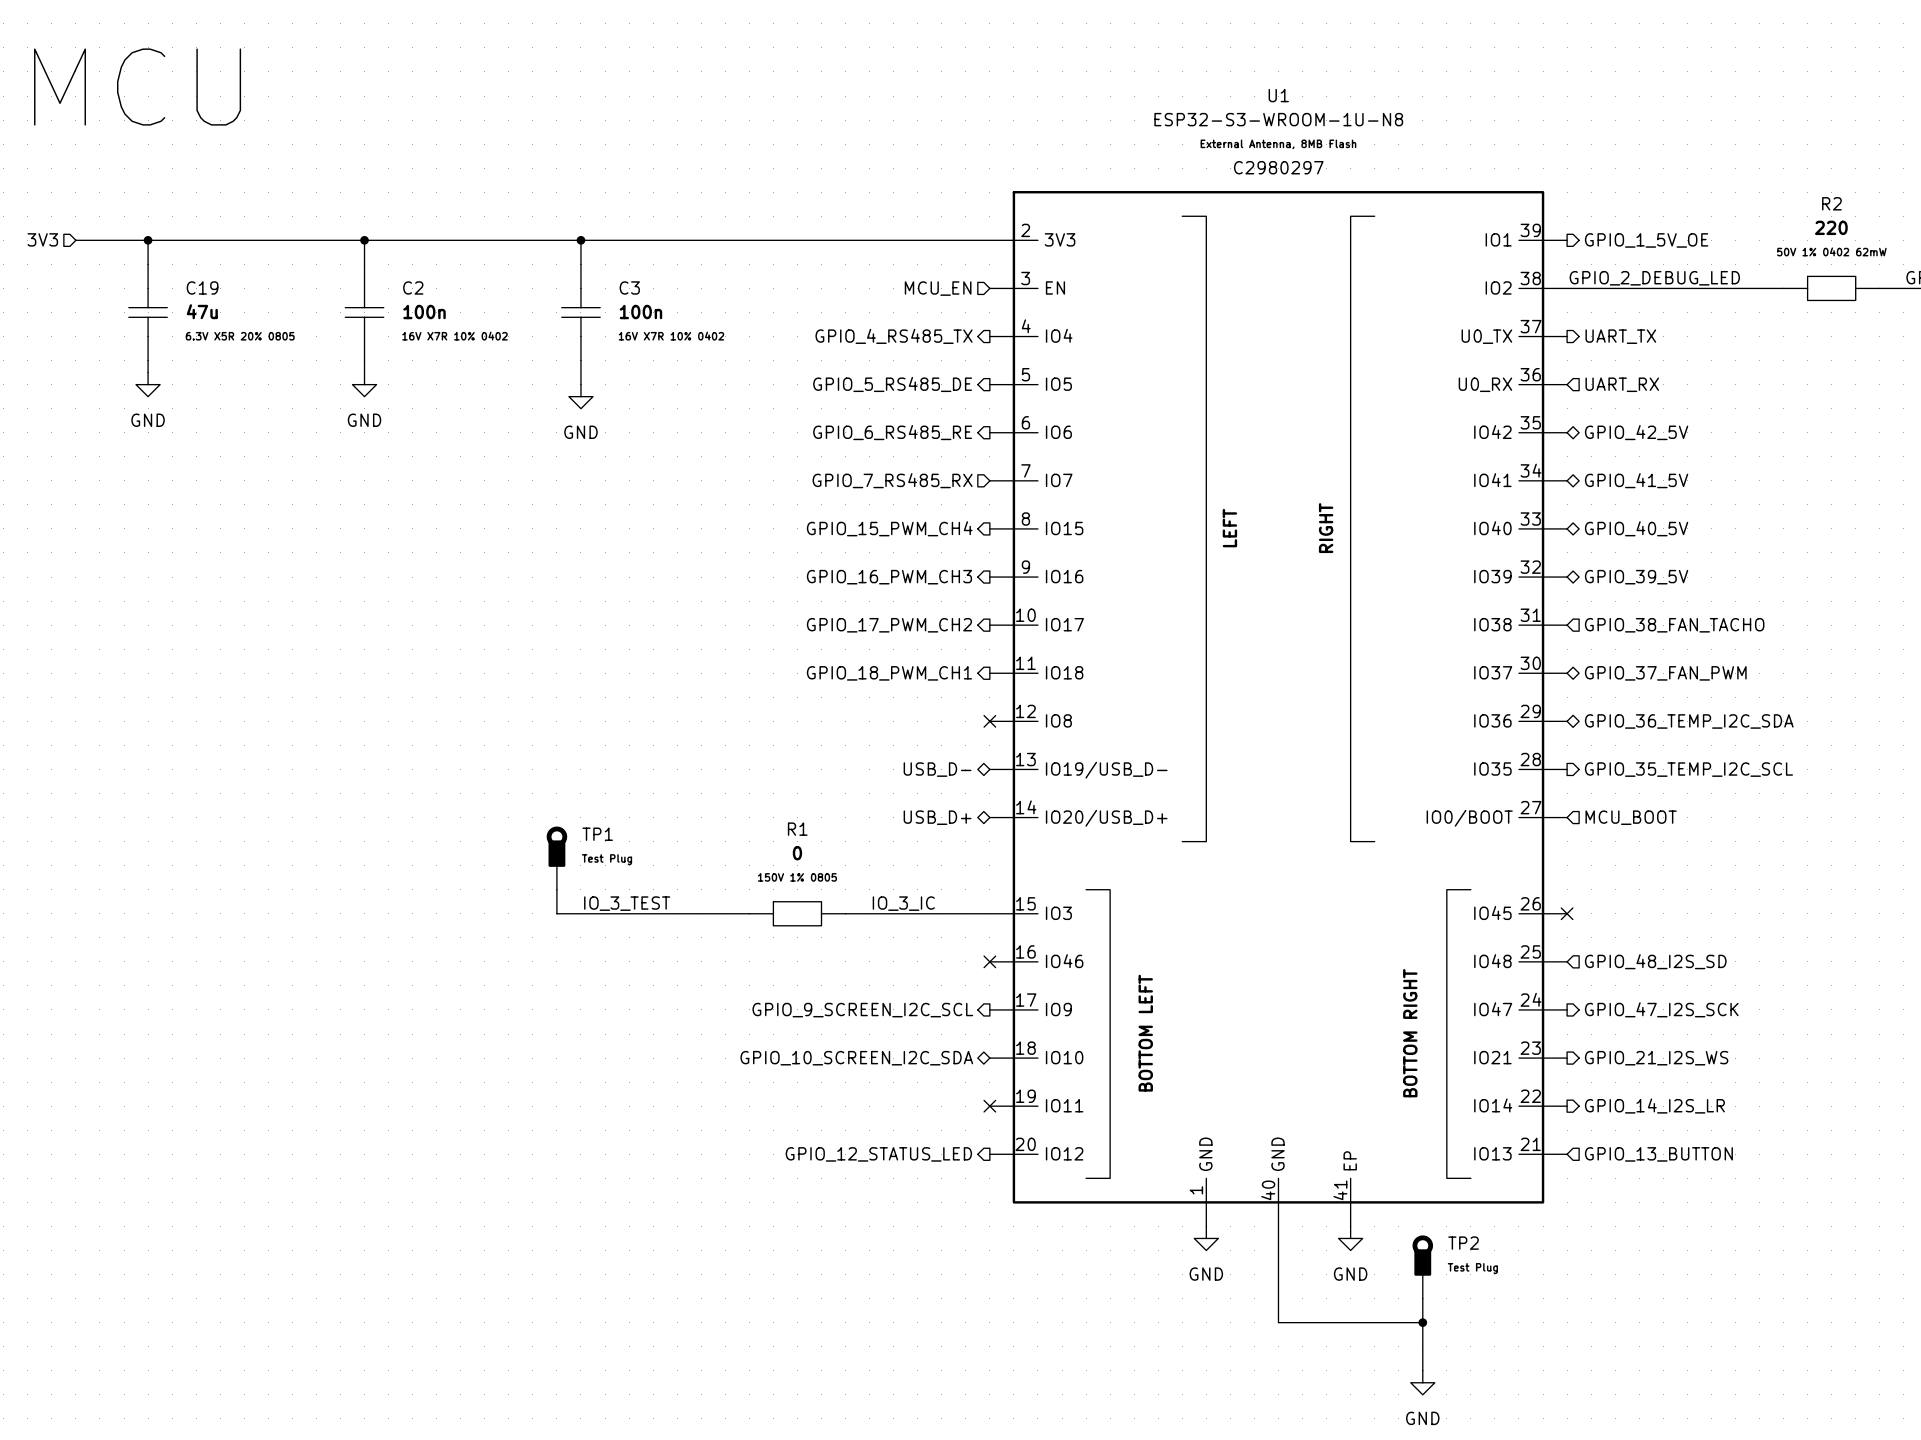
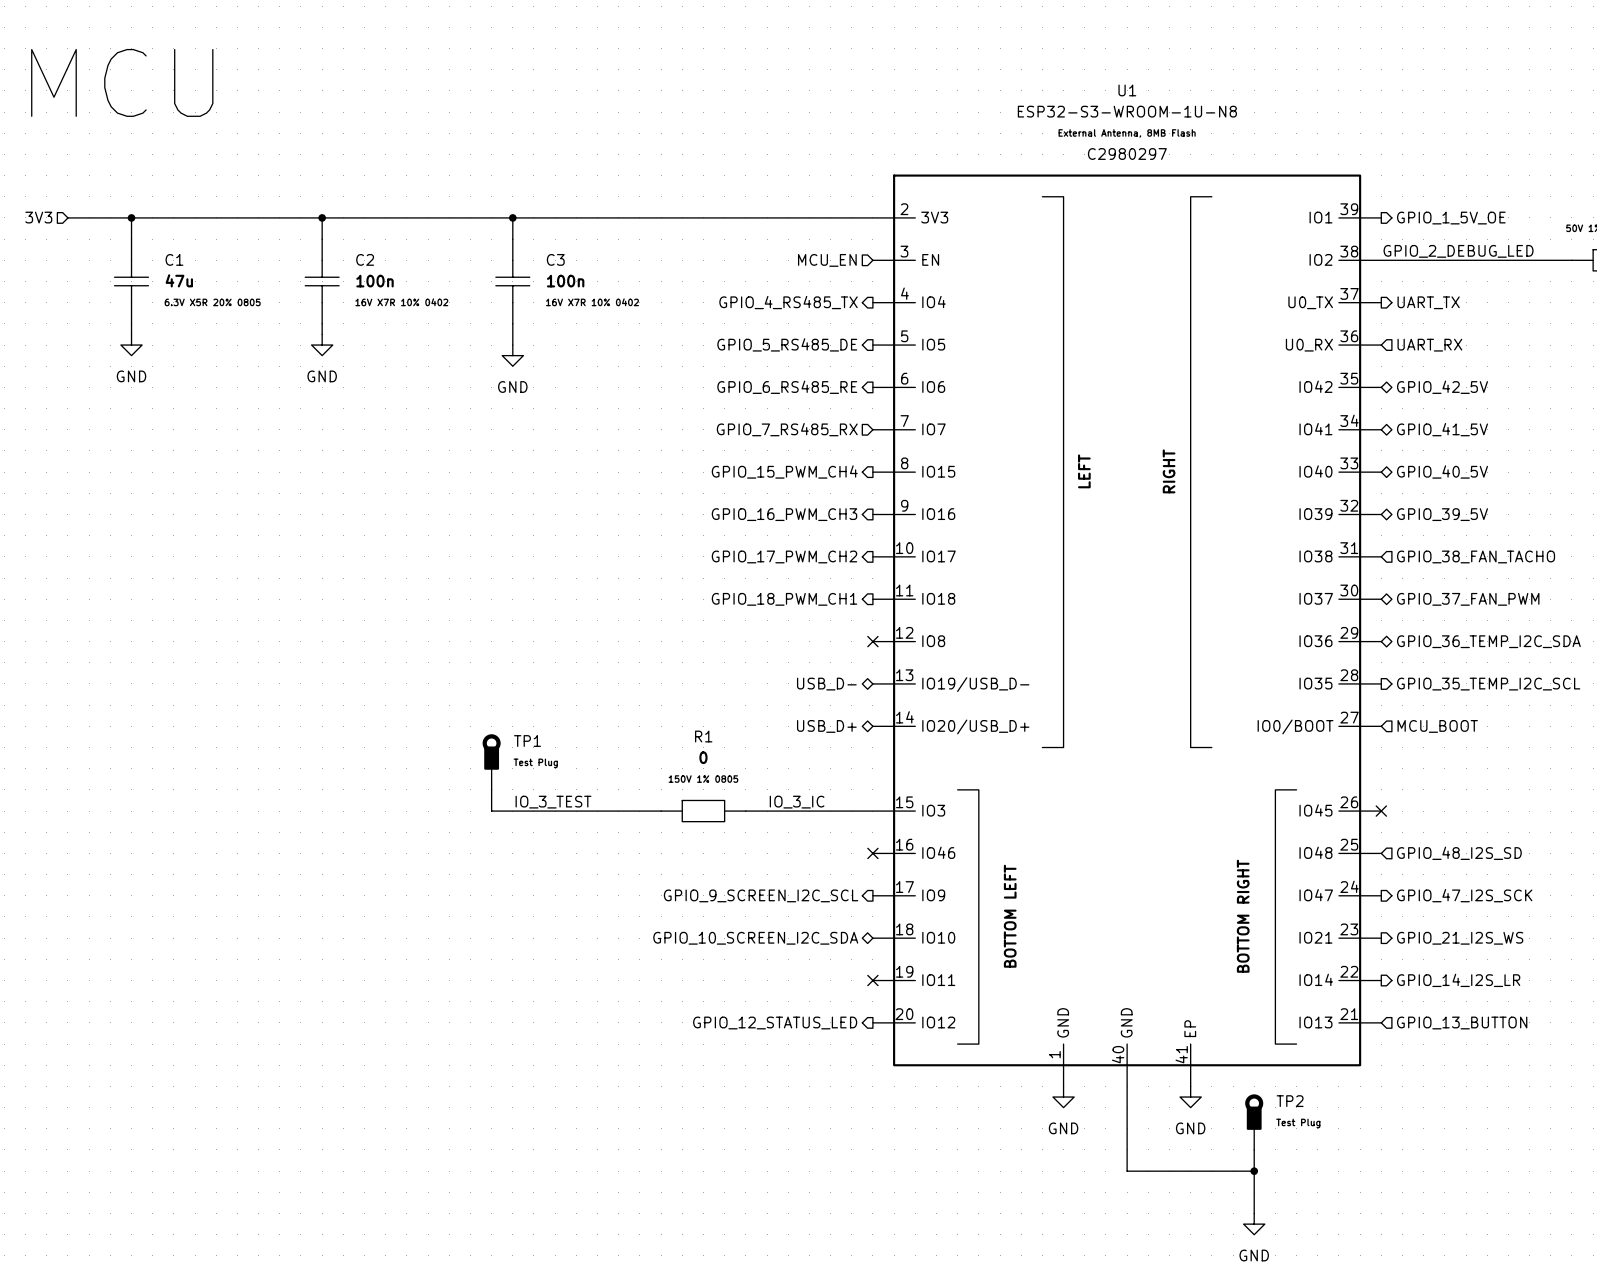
C19 name: C19 (202, 287) -> C1 (174, 259)

